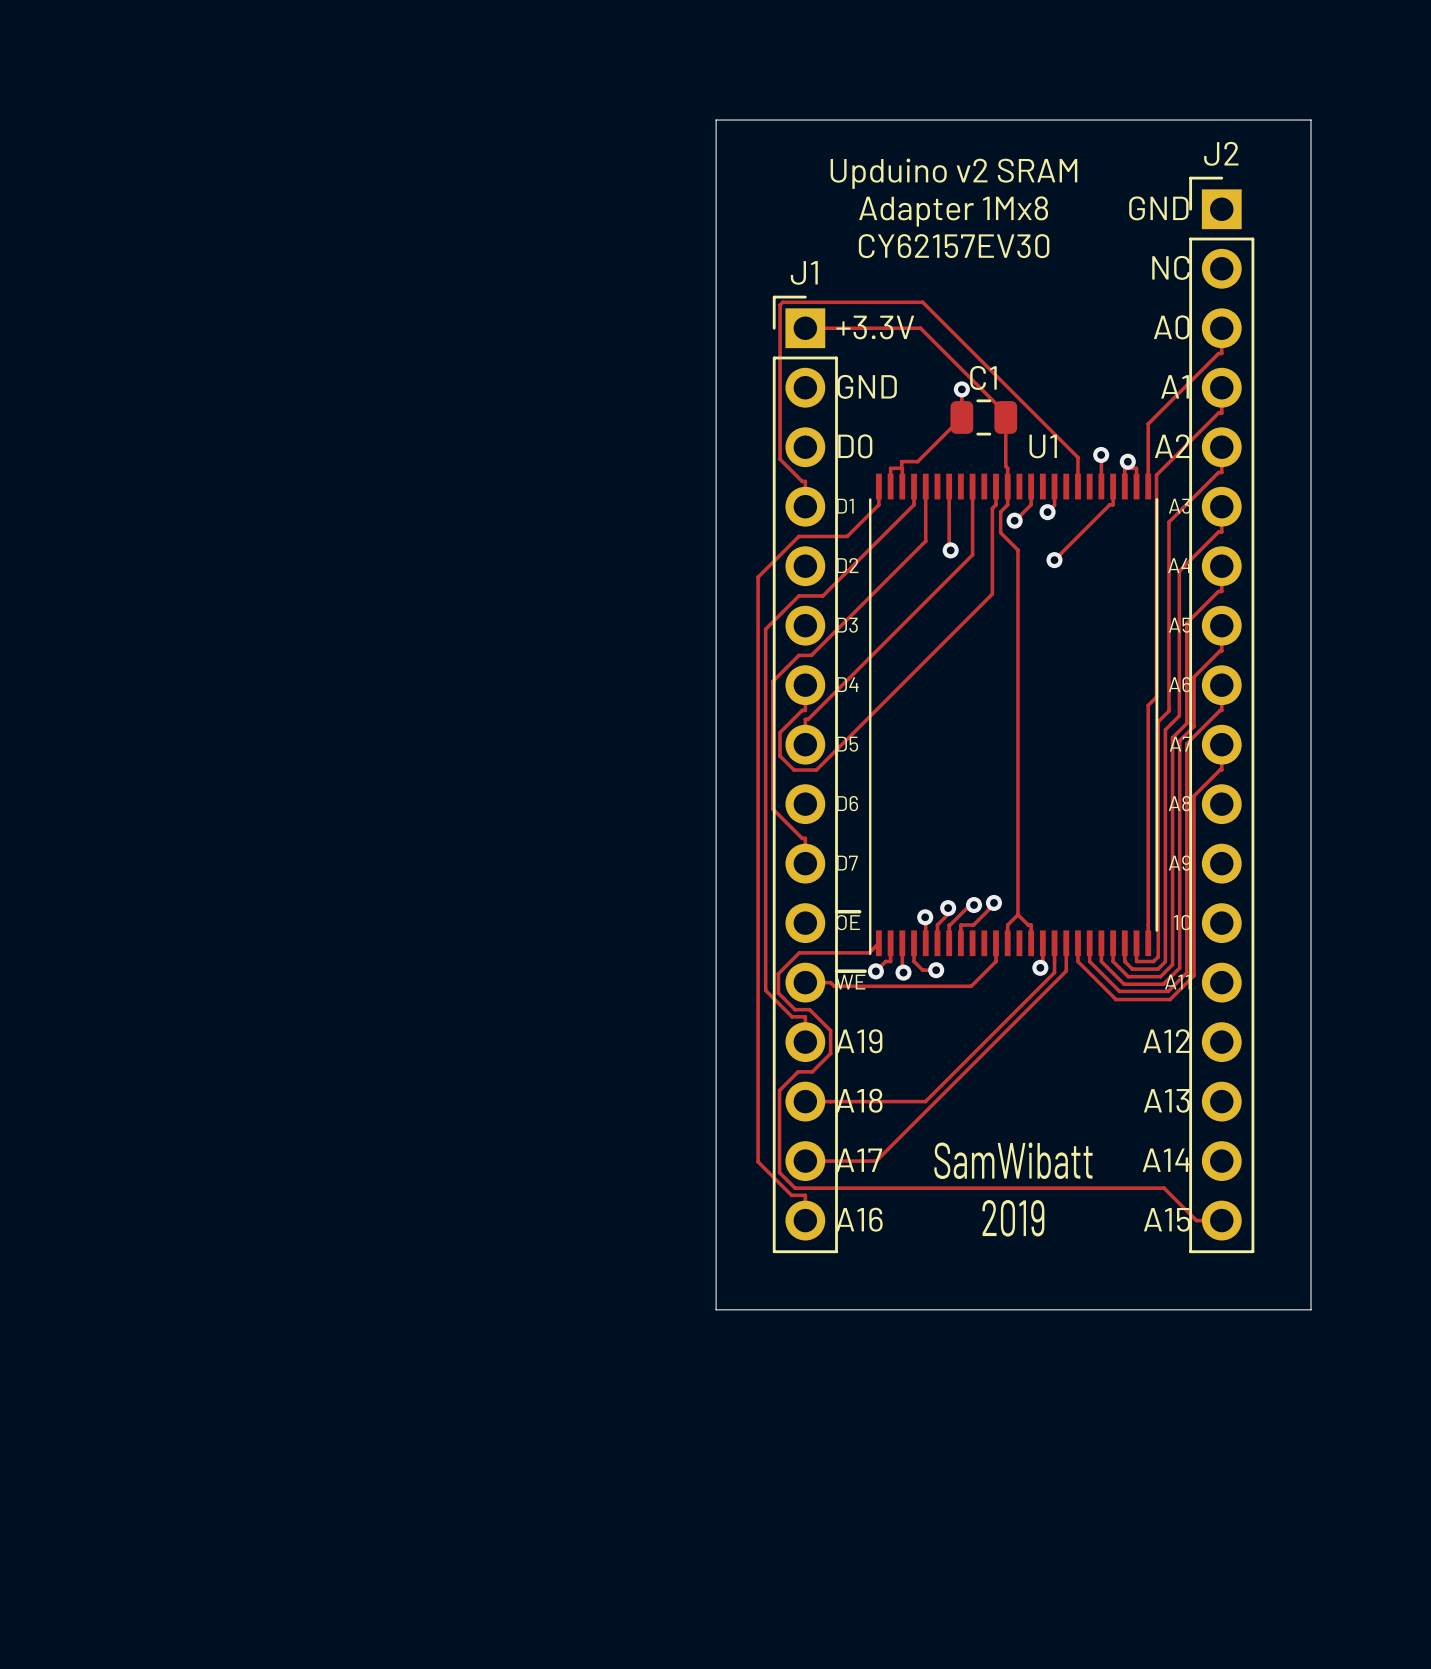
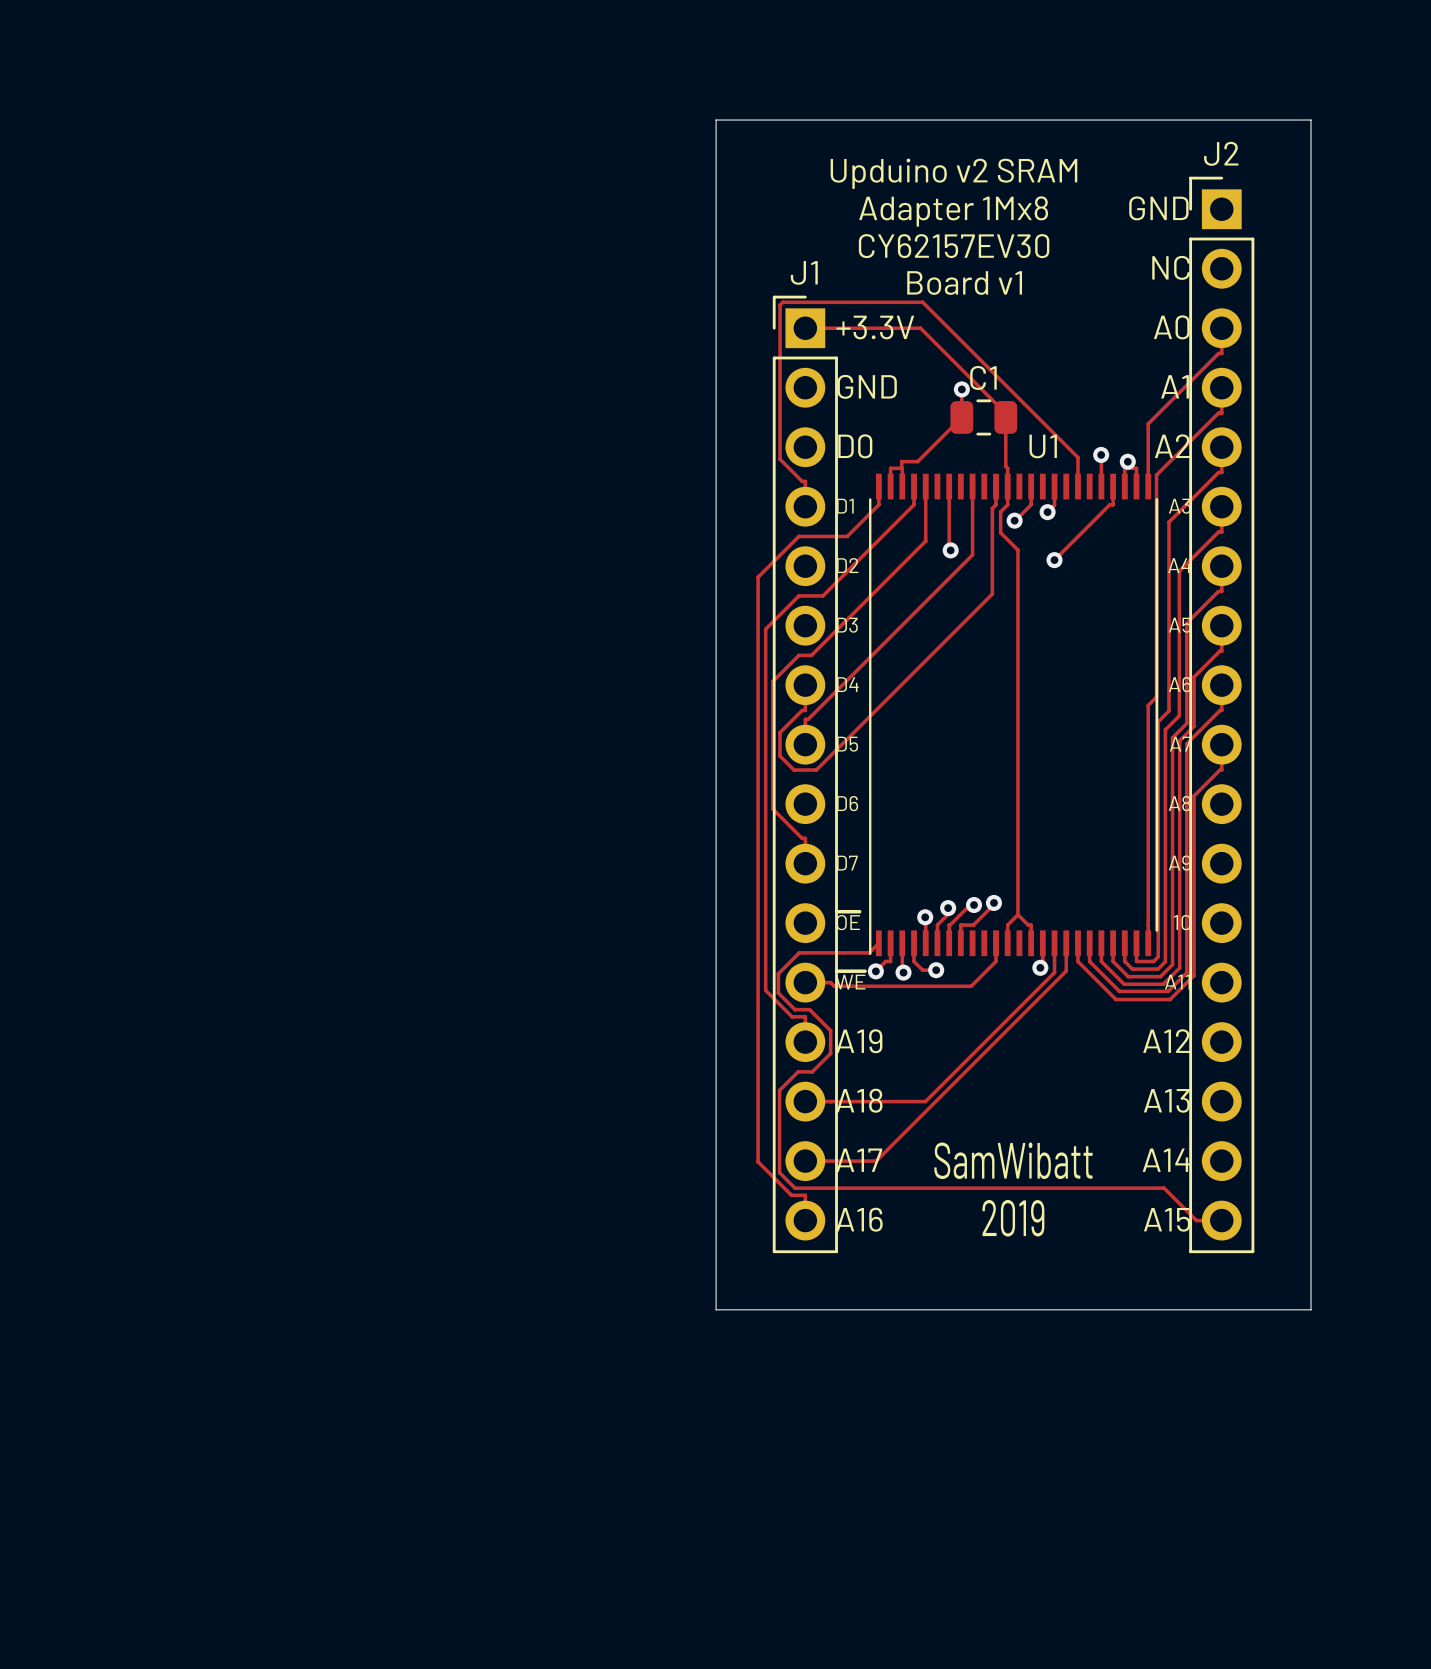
text: none -> Board v1 (964, 283)

